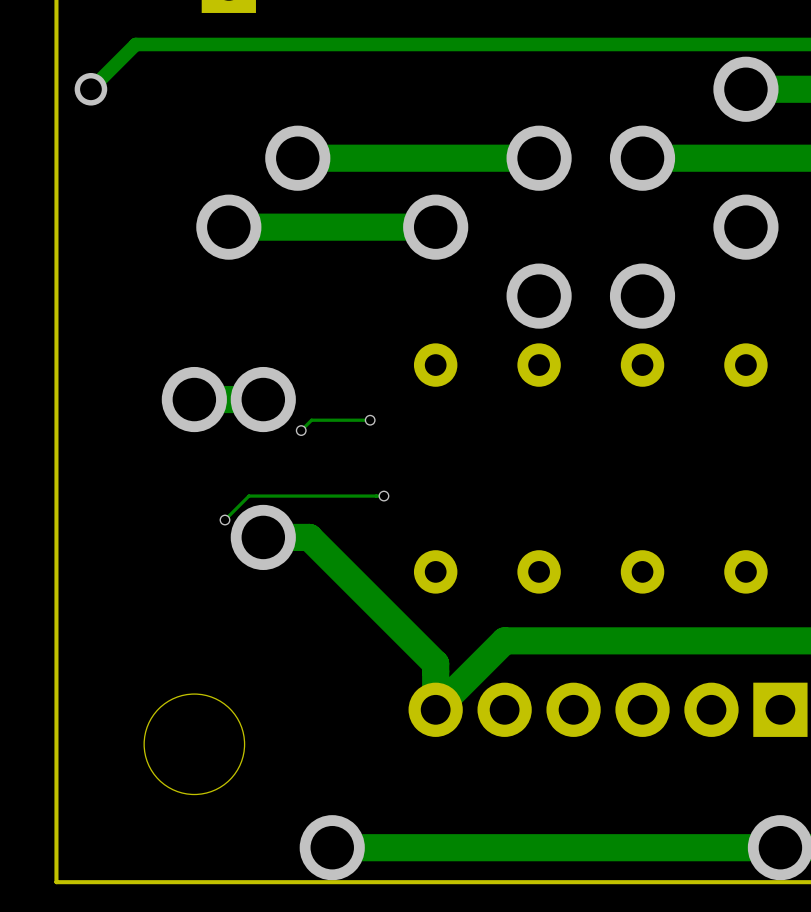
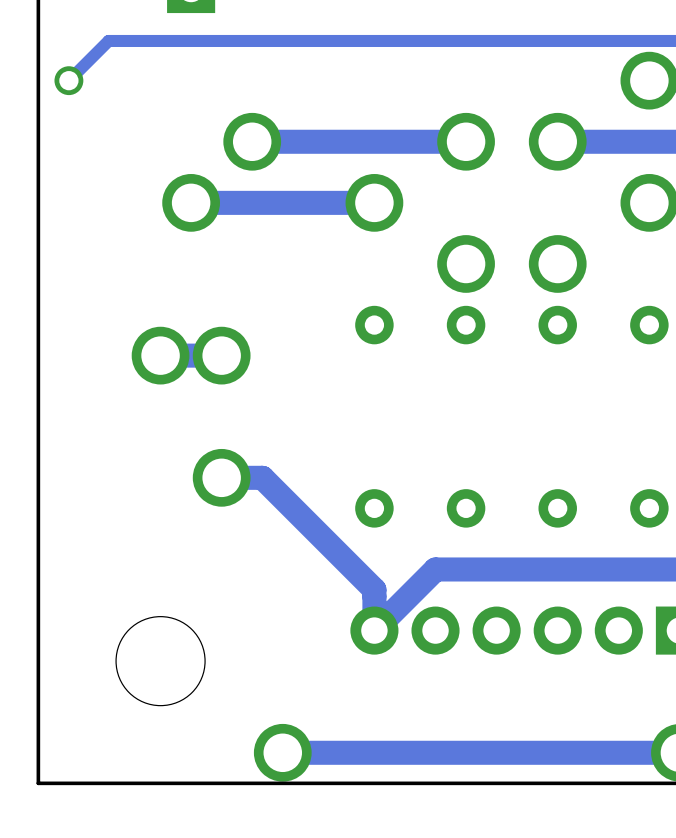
track: (370, 420) (311, 420) (301, 430) -> none
via: (370, 420) -> none
via: (301, 430) -> none
track: (383, 496) (248, 496) (225, 520) -> none
via: (383, 496) -> none
via: (225, 520) -> none

